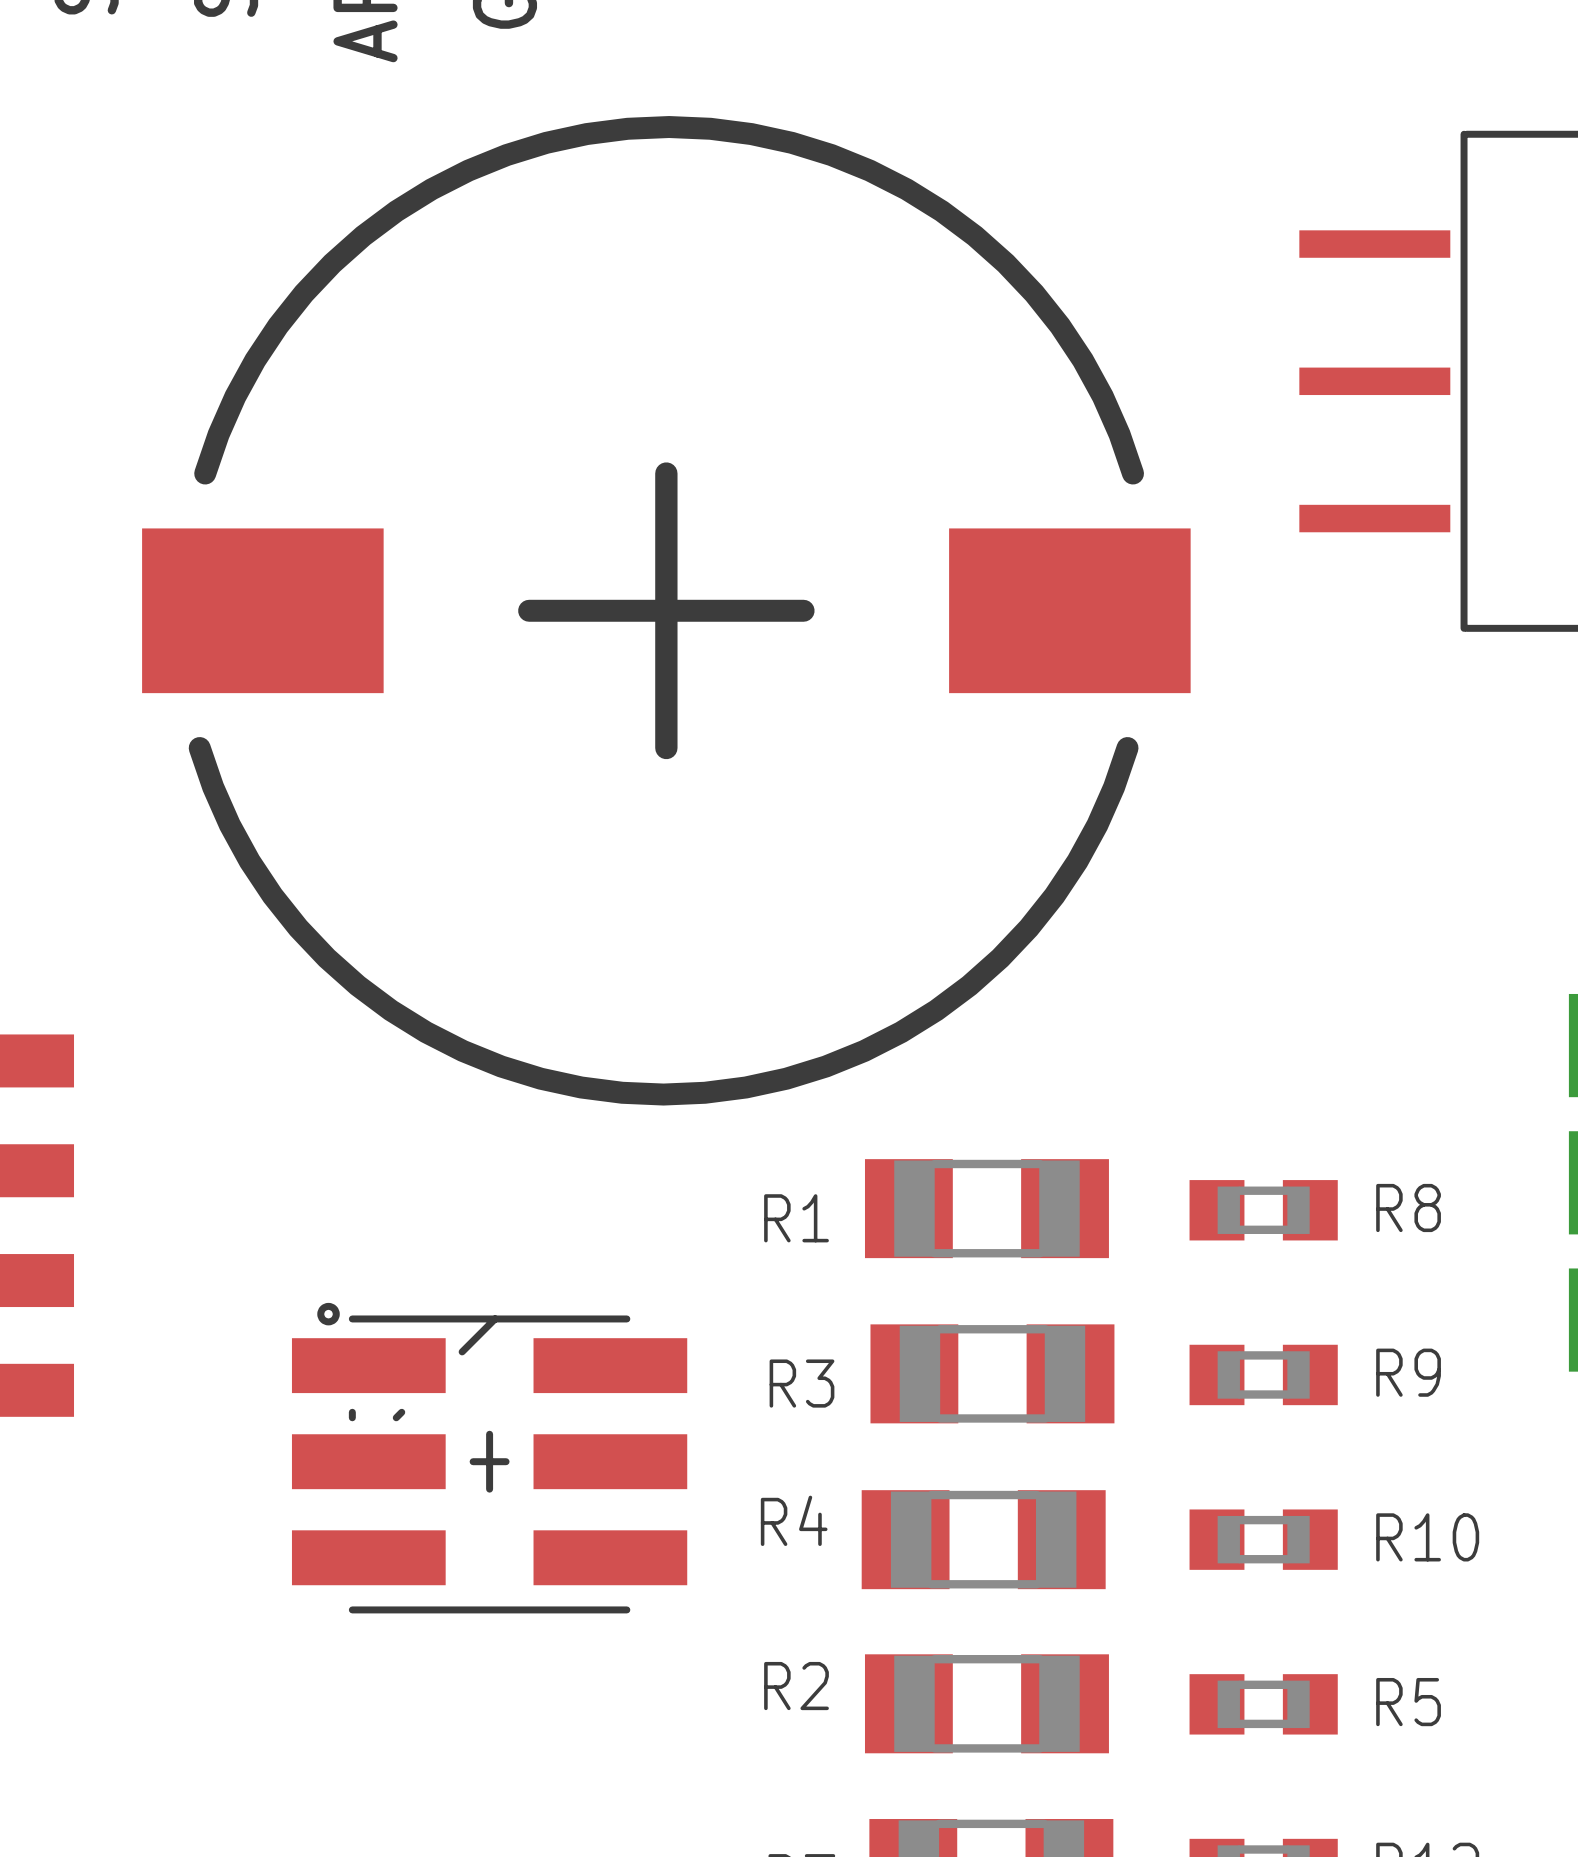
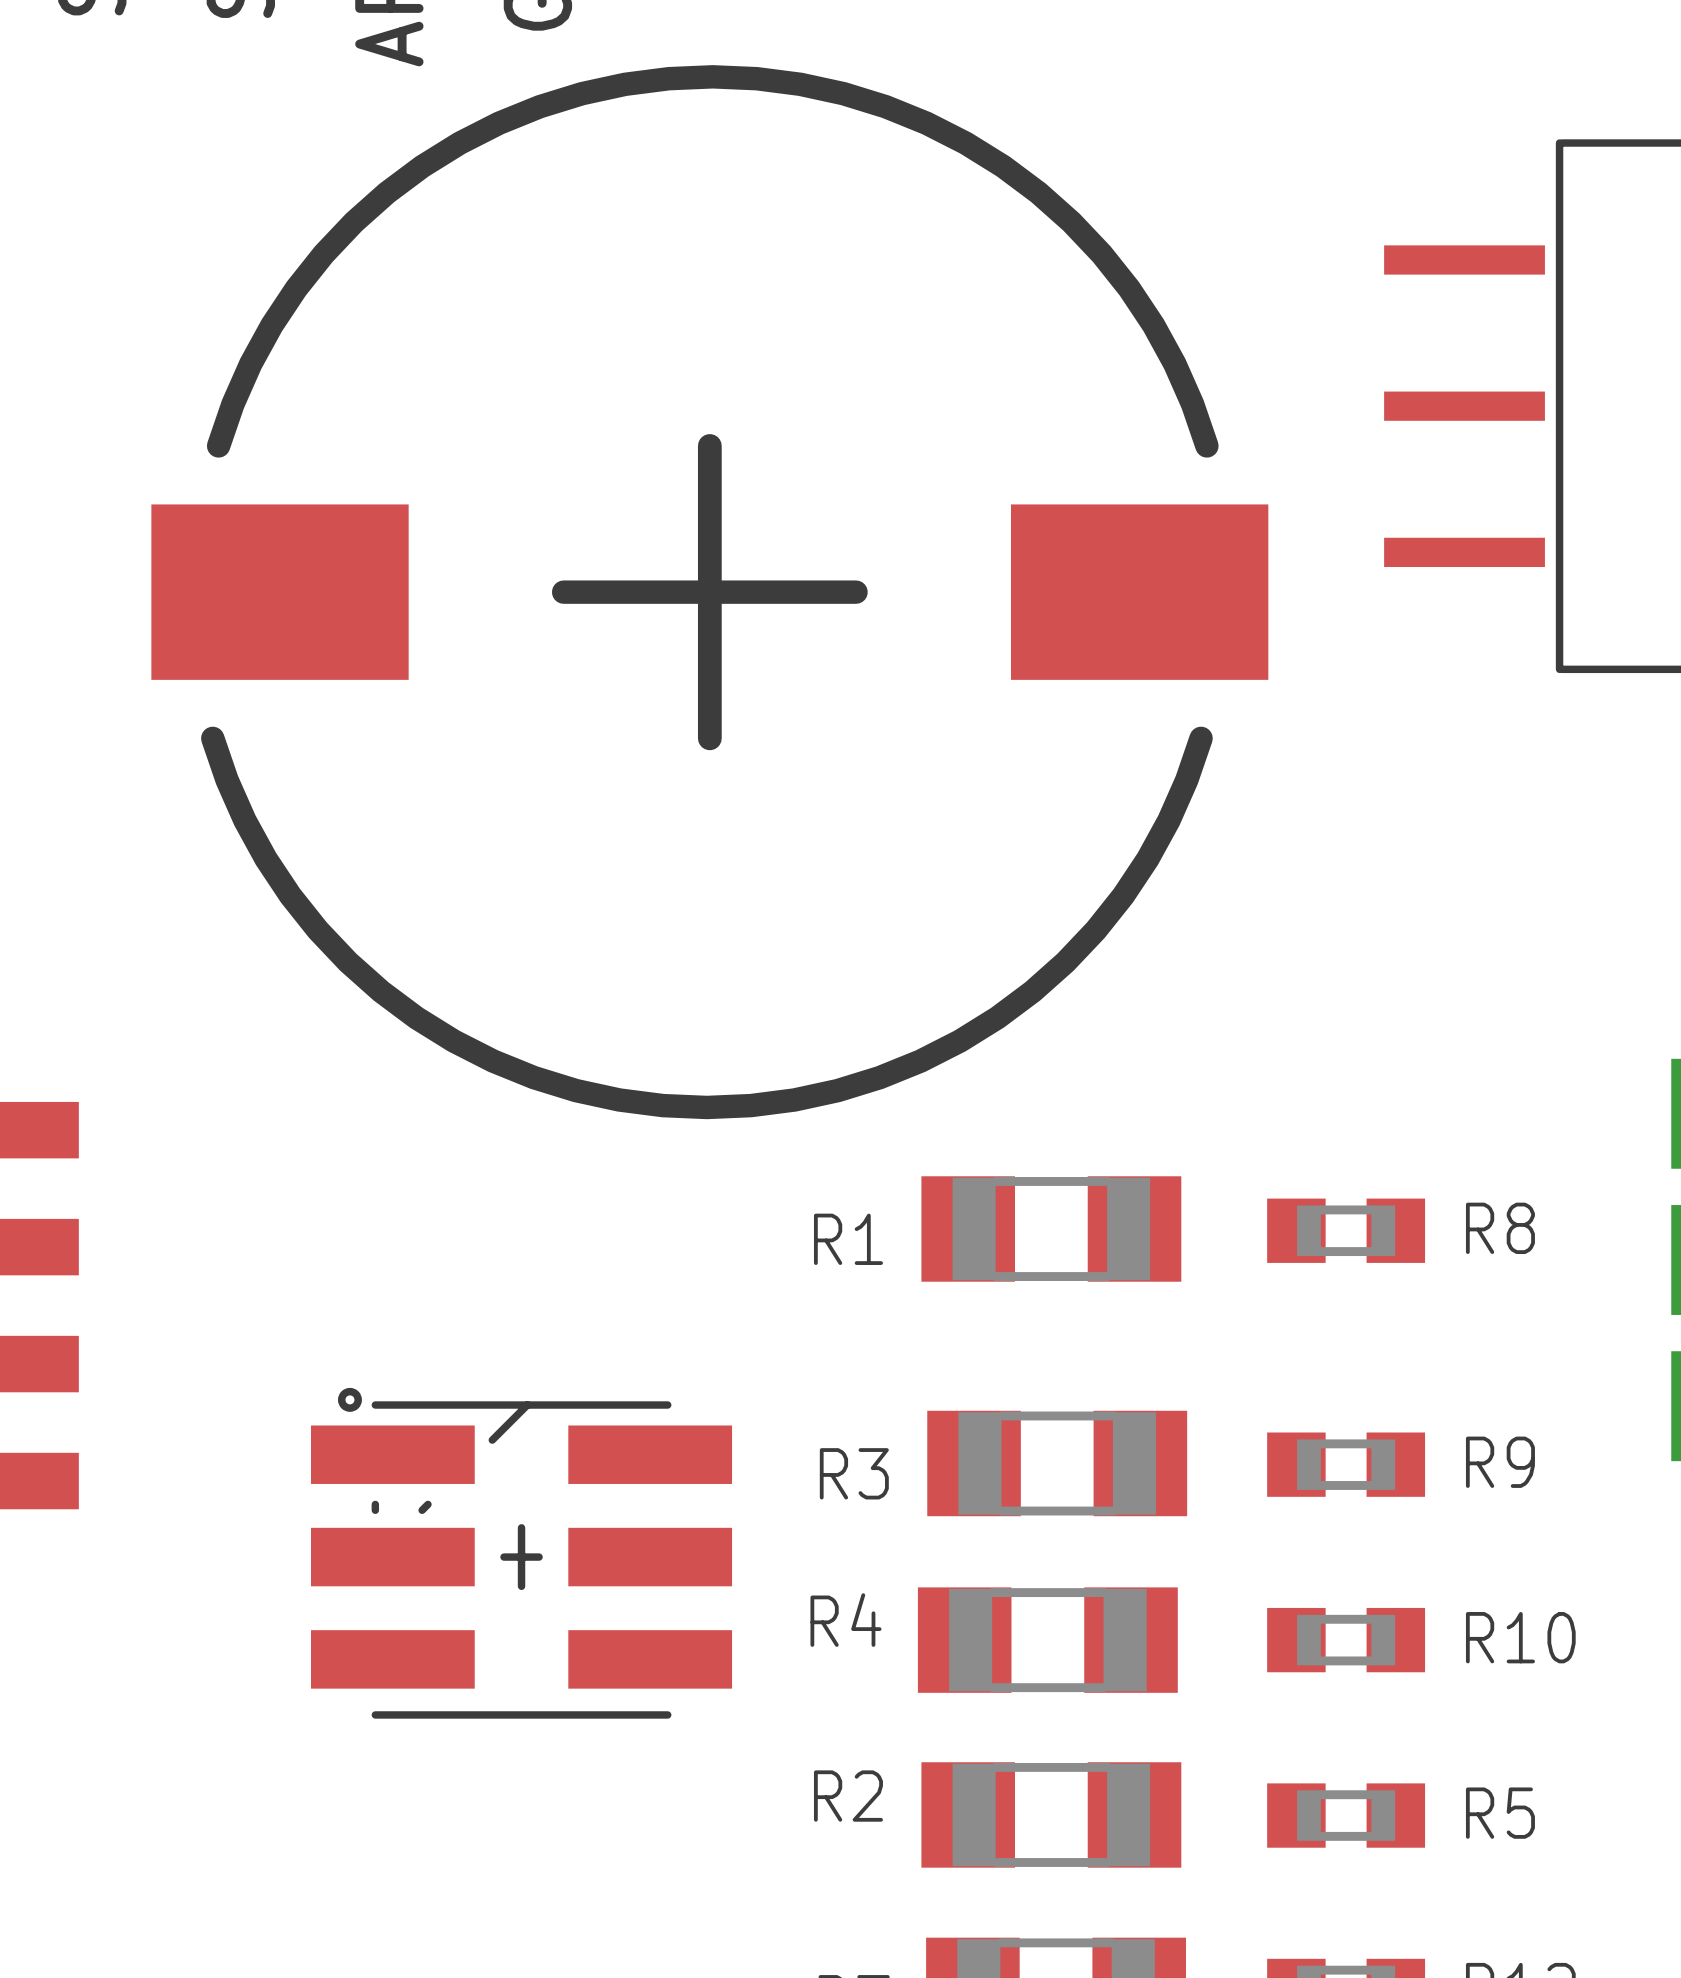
part position: (666, 610) -> (709, 592)
R1 position: (986, 1208) -> (1051, 1228)
R8 position: (1263, 1210) -> (1346, 1230)

